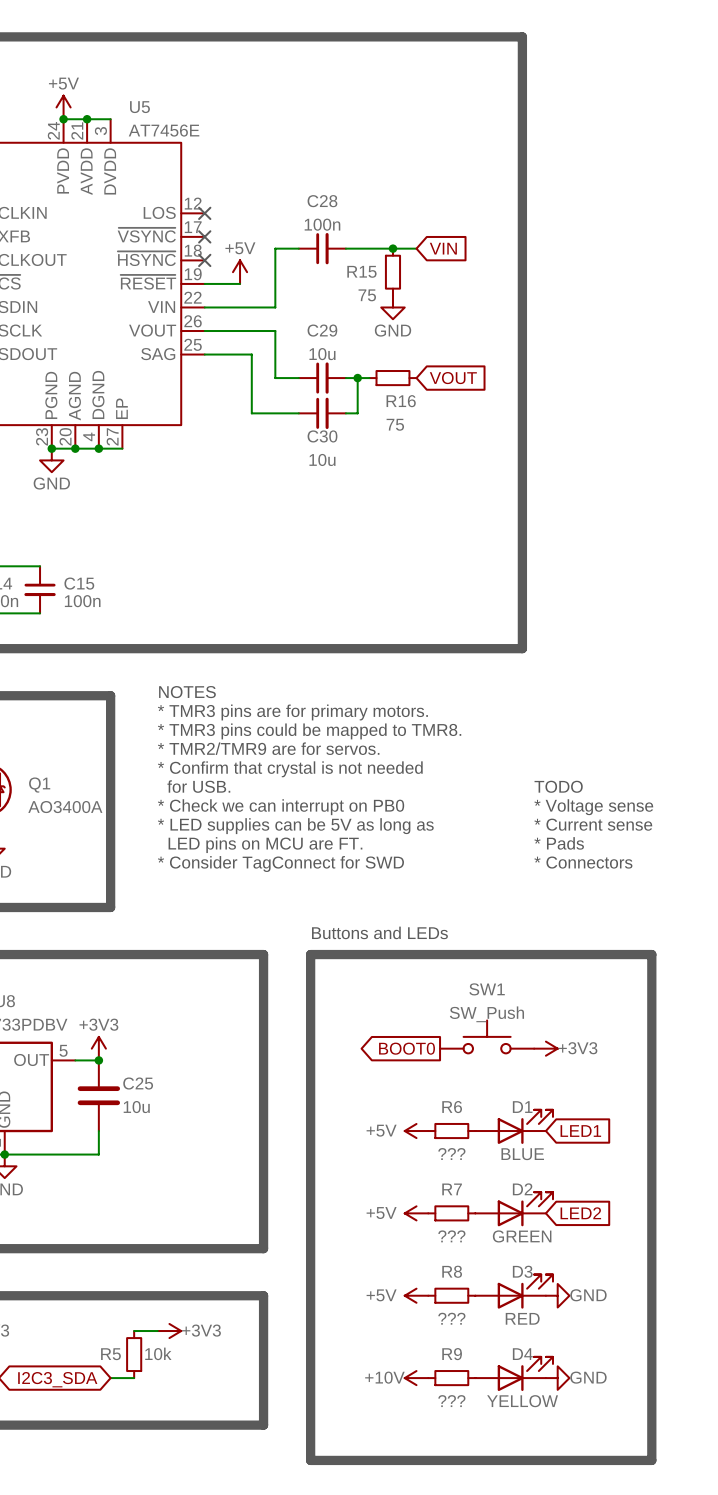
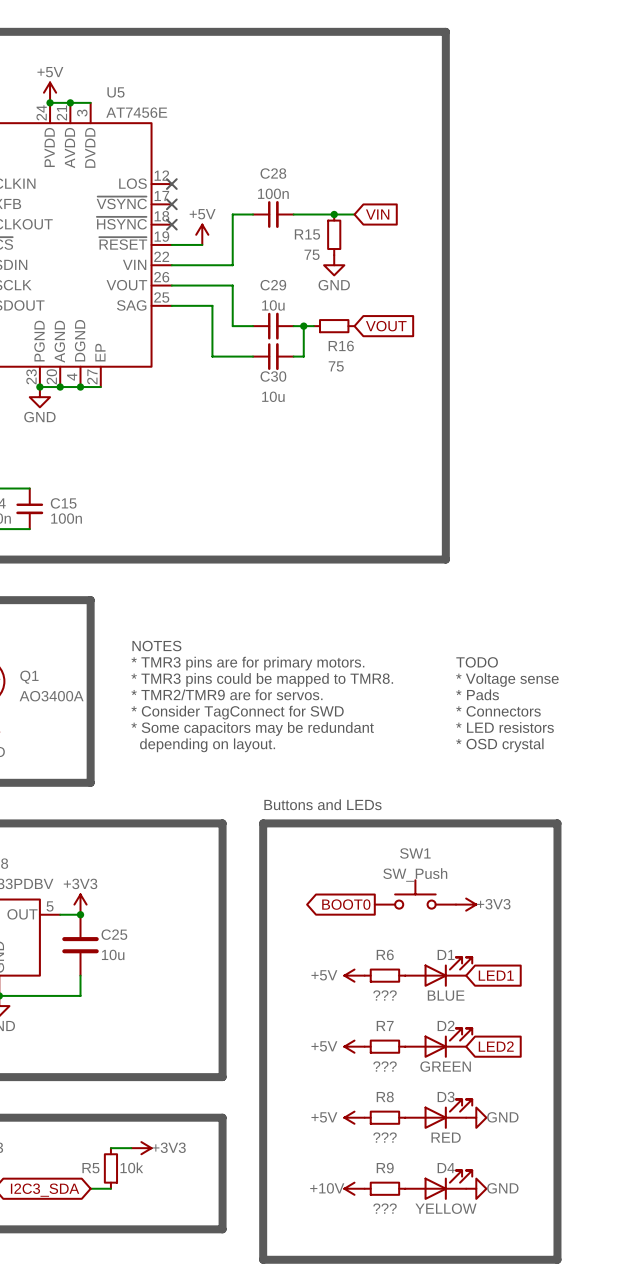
text: NOTES (187, 692) -> none
text: * TMR3 pins are for primary motors. (292, 712) -> none
text: * TMR3 pins could be mapped to TMR8. (309, 731) -> none
text: * TMR2/TMR9 are for servos. (268, 748) -> NOTES (156, 646)
text: none -> TODO (477, 662)
text: * Confirm that crystal is not needed (290, 769) -> * TMR3 pins are for primary motors. (247, 663)
text: for USB. (198, 786) -> * TMR3 pins could be mapped to TMR8. (262, 679)
text: TODO (558, 786) -> * Voltage sense (507, 679)
text: * Check we can interrupt on PB0 (281, 807) -> * TMR2/TMR9 are for servos. (227, 694)
text: * Voltage sense (593, 807) -> * Pads (477, 694)
text: * Current sense (593, 824) -> * Connectors (498, 711)
text: * LED supplies can be 5V as long as (295, 826) -> * Consider TagConnect for SWD (237, 712)
text: * Pads (559, 843) -> * LED resistors (505, 727)
text: LED pins on MCU are FT. (265, 845) -> * Some capacitors may be redundant (252, 728)
text: * Connectors (583, 862) -> * OSD crystal (499, 745)
text: * Consider TagConnect for SWD (280, 864) -> depending on layout. (207, 745)

